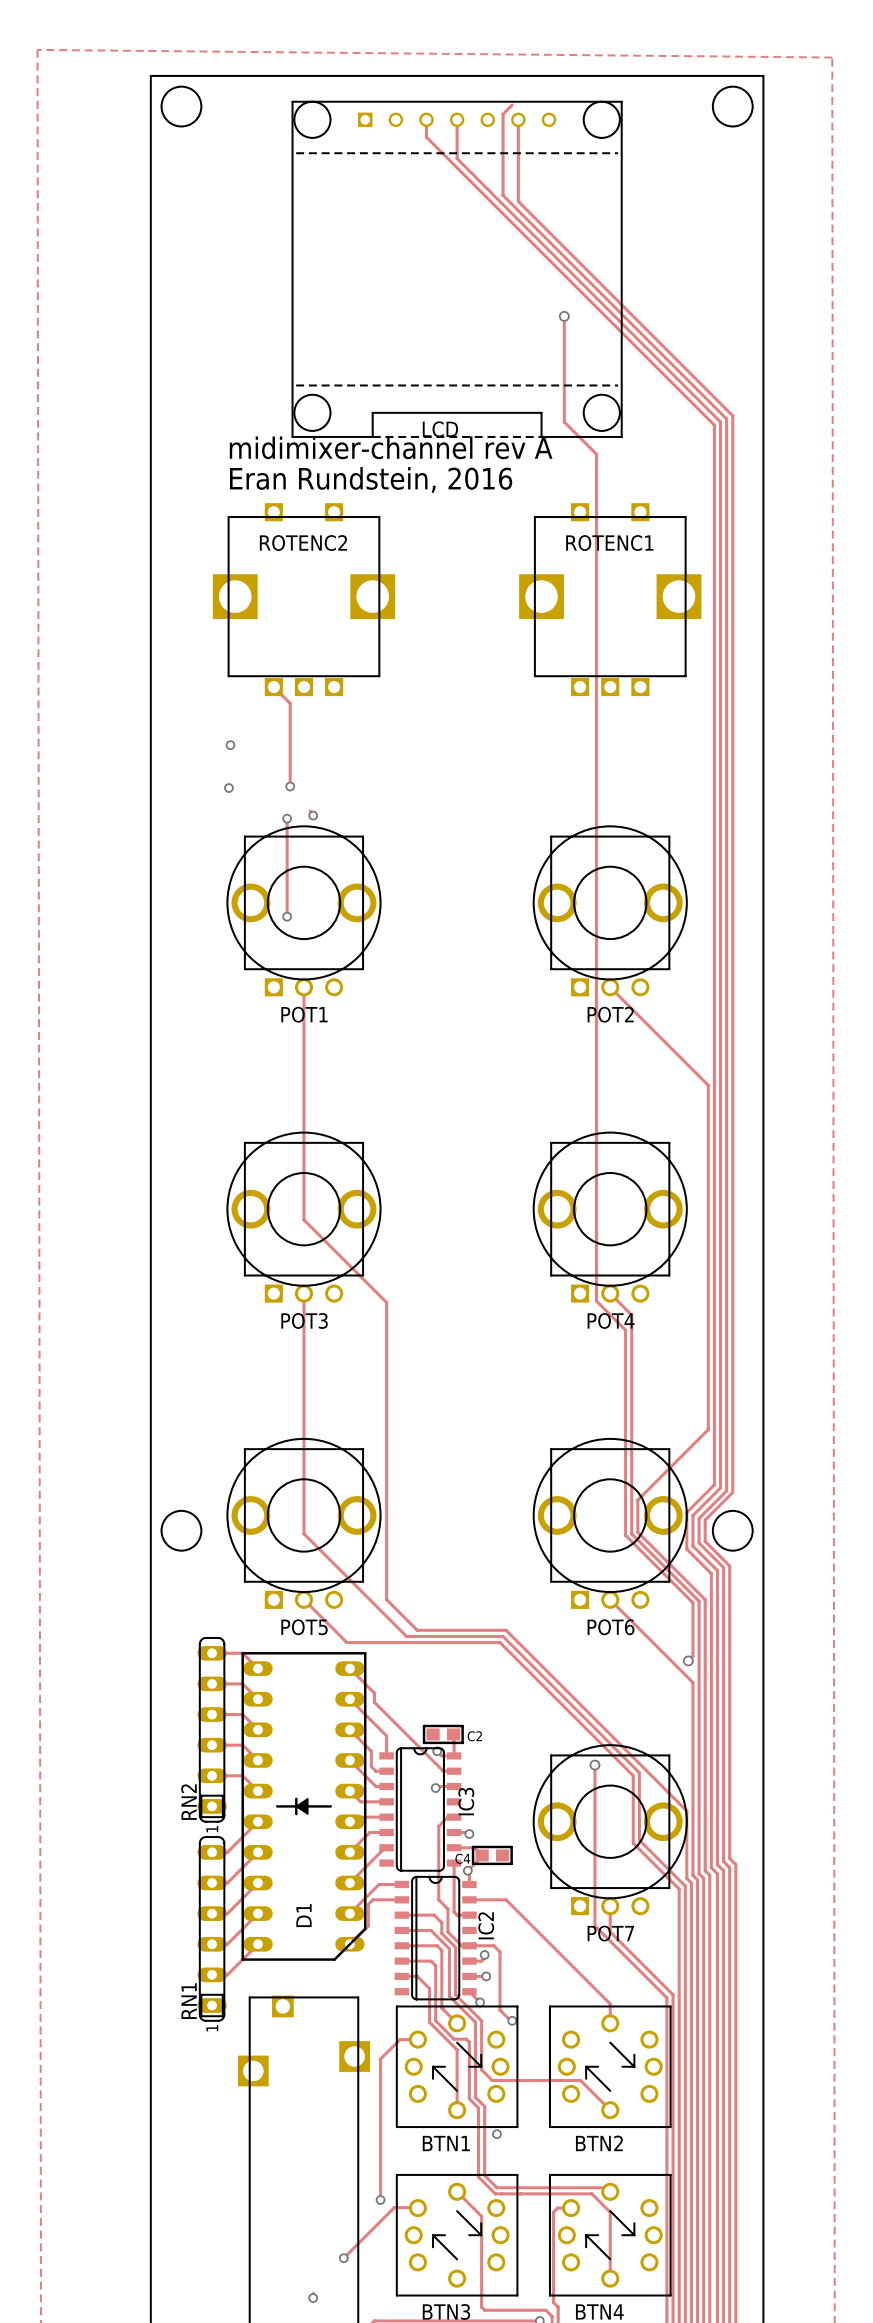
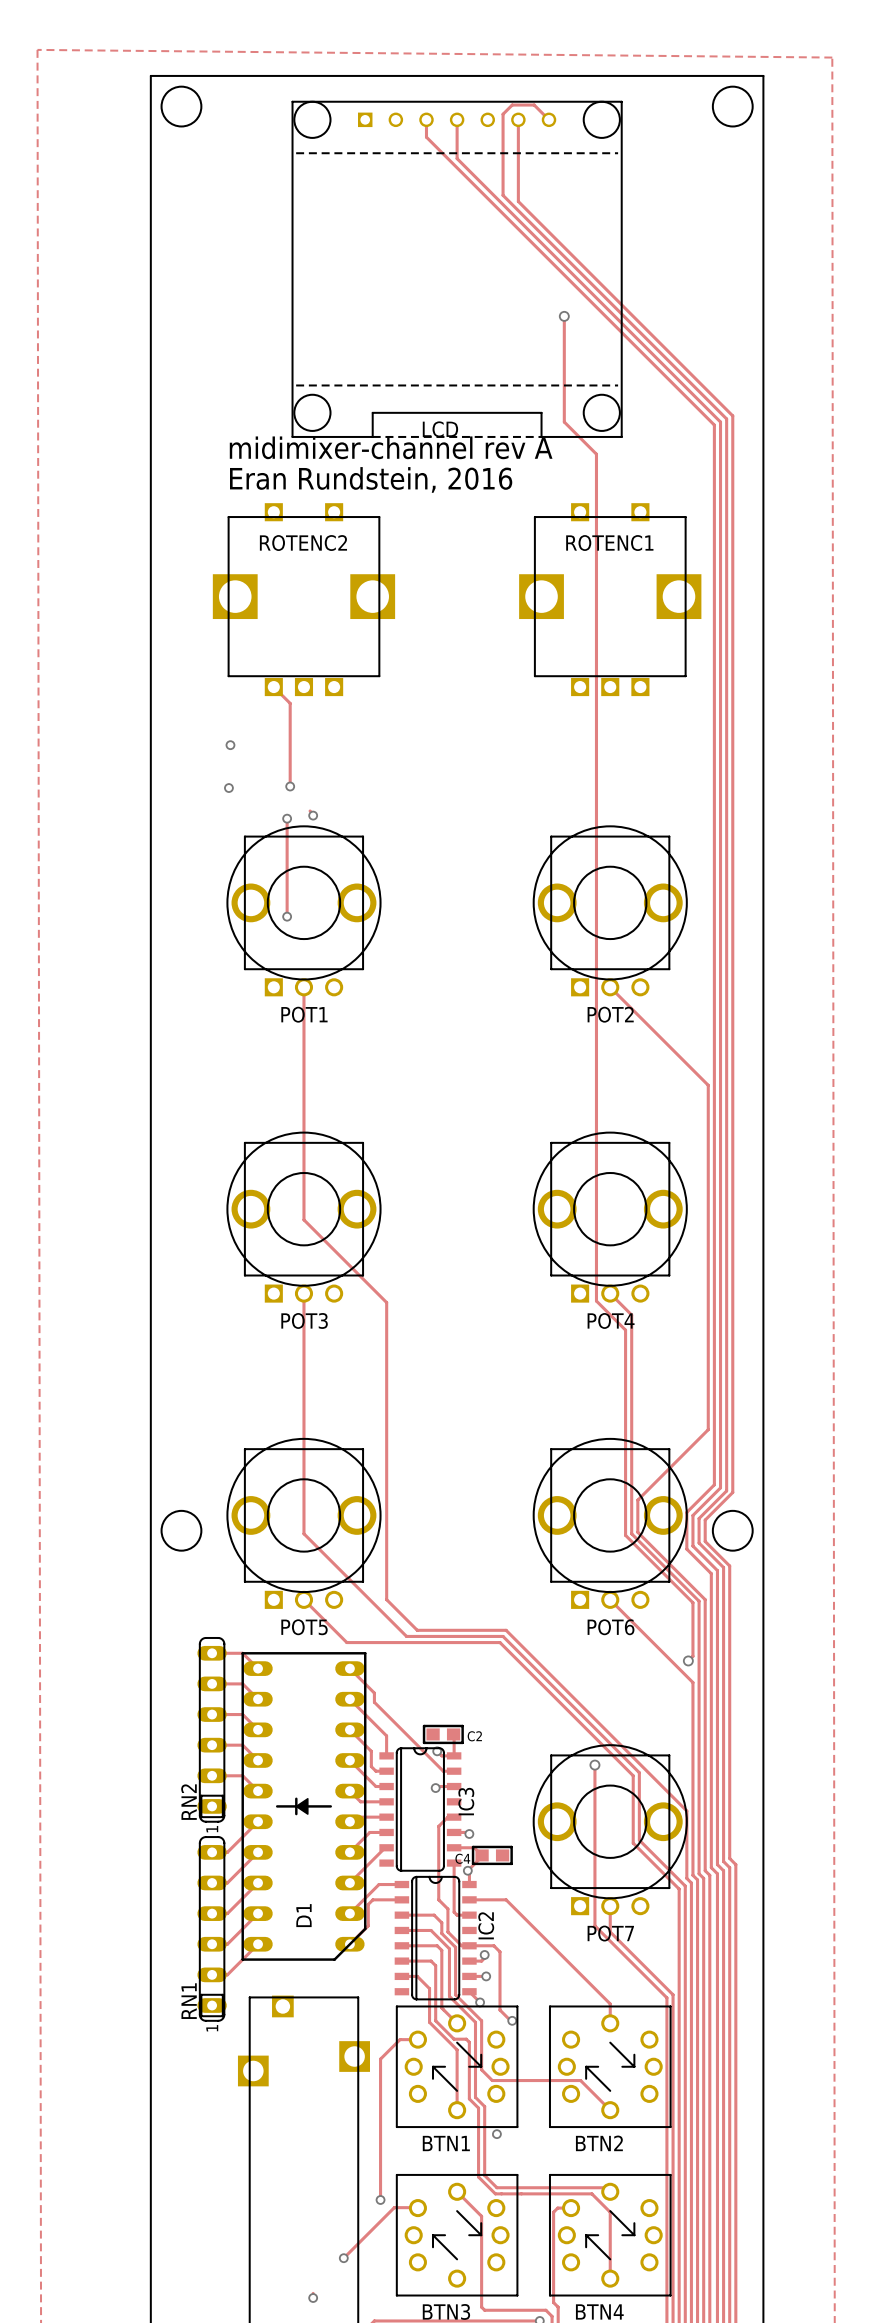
track: none -> (512, 105) (534, 105) (549, 119)

